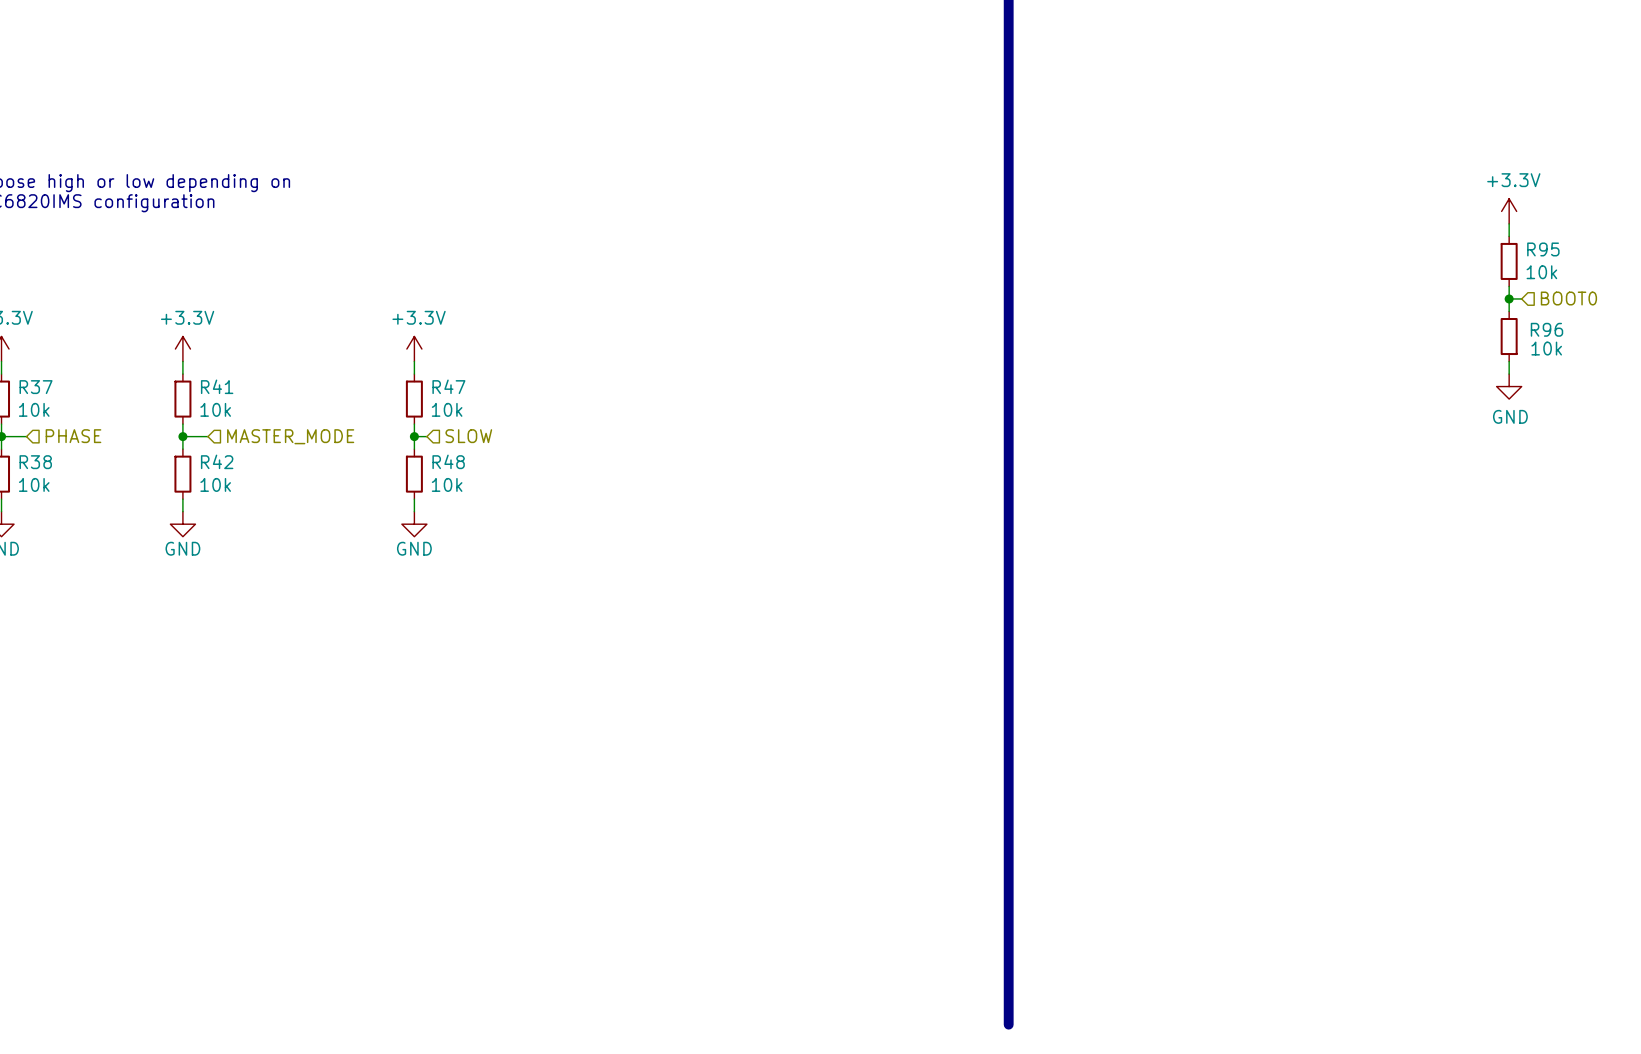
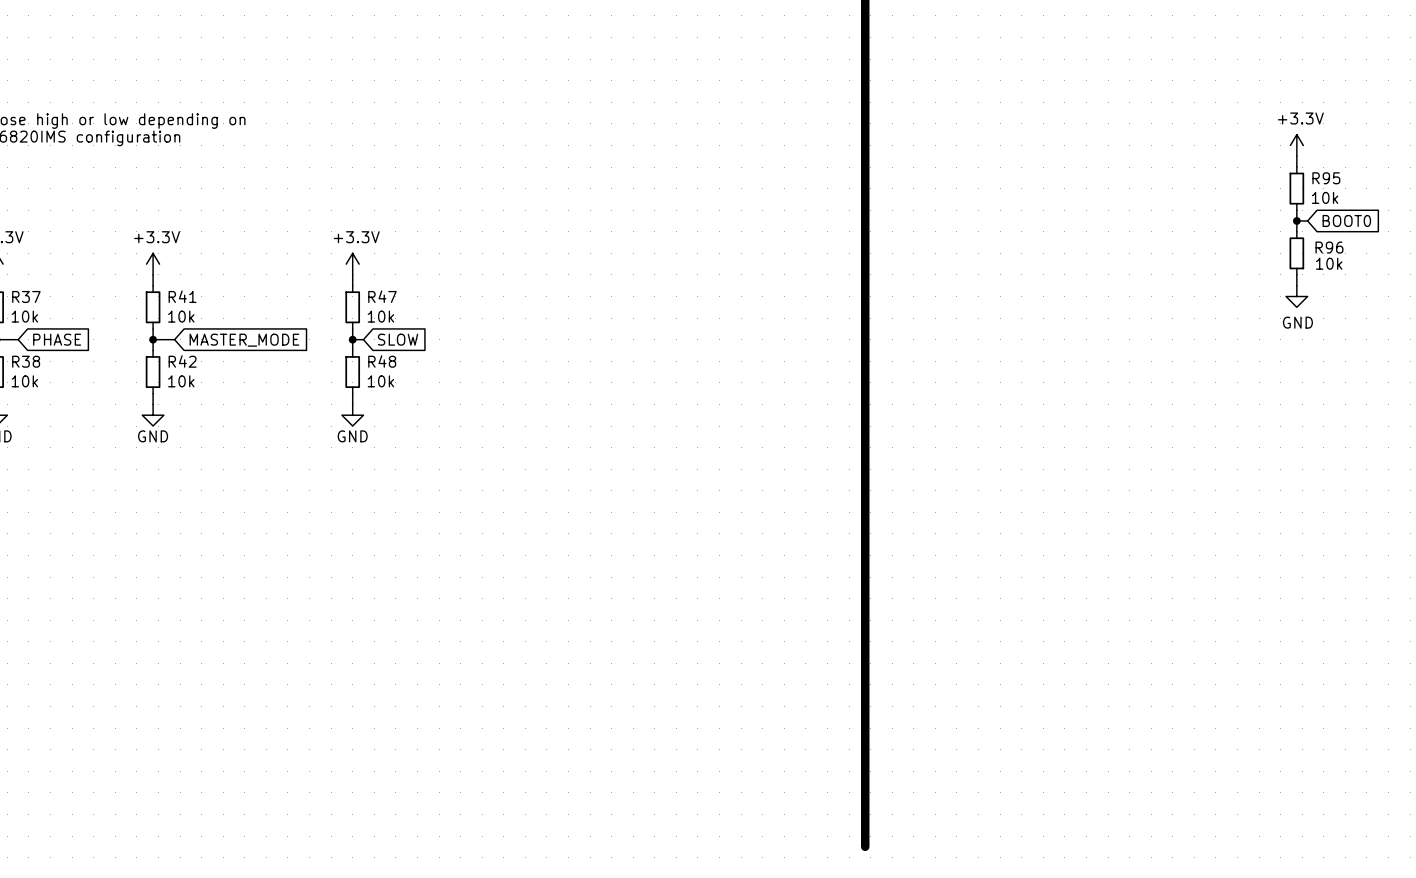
global label: none -> BOOT0 (1346, 220)
hierarchical label: BOOT0 (1568, 298) -> none
global label: none -> PHASE (57, 339)
hierarchical label: PHASE (73, 436) -> none
hierarchical label: MASTER_MODE (290, 436) -> none
global label: none -> SLOW (398, 339)
hierarchical label: SLOW (468, 436) -> none
global label: none -> MASTER_MODE (244, 340)

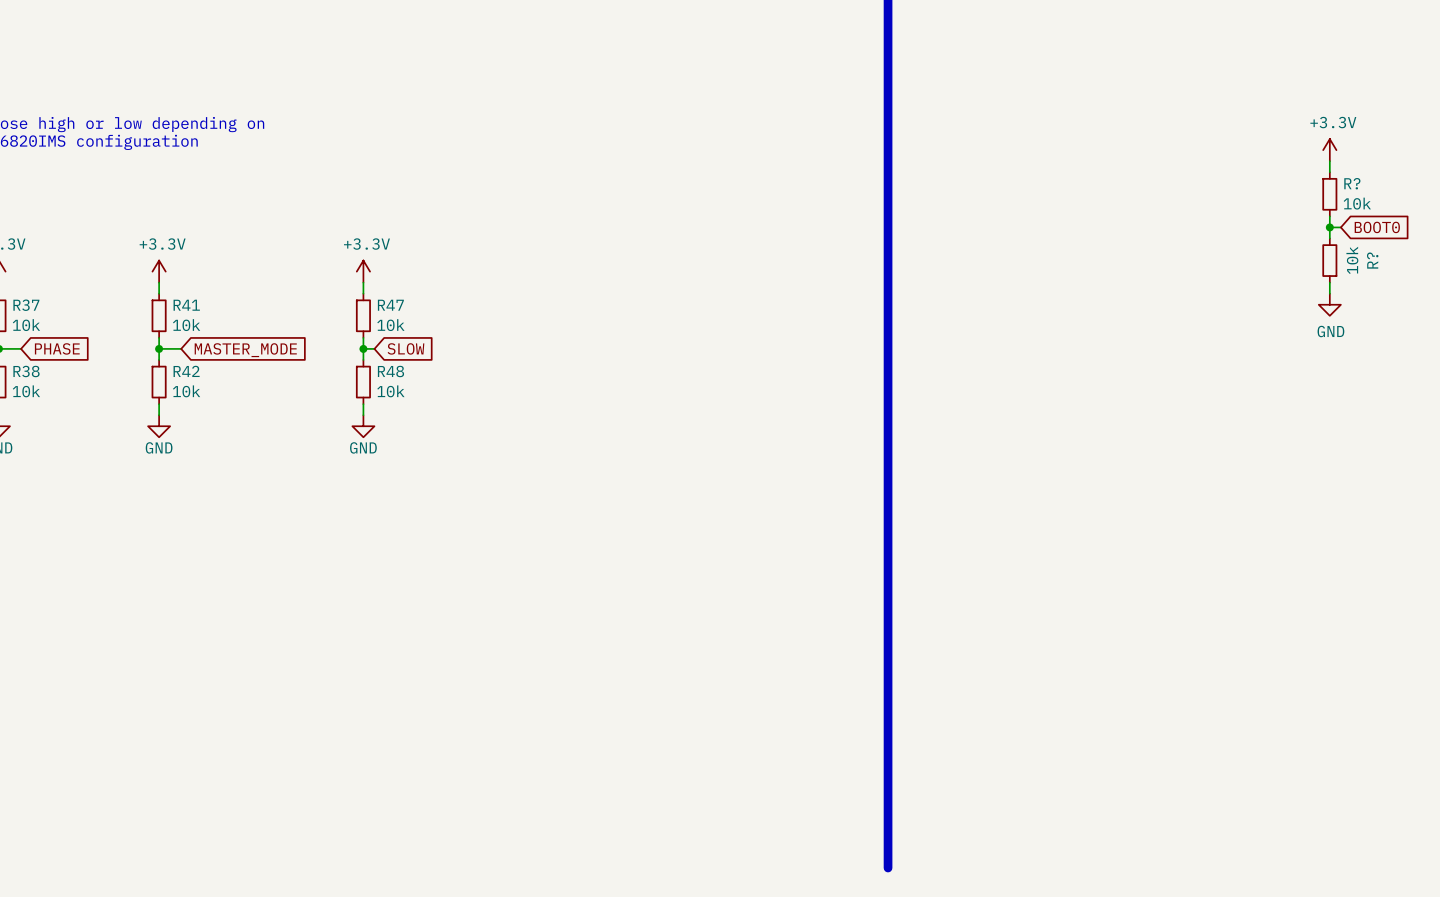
R95 name: R95 (1326, 178) -> R? (1352, 183)
R96 name: R96 (1329, 247) -> R? (1372, 260)
R96 value rotation: 0° (1329, 263) -> 90° counterclockwise (1352, 260)

